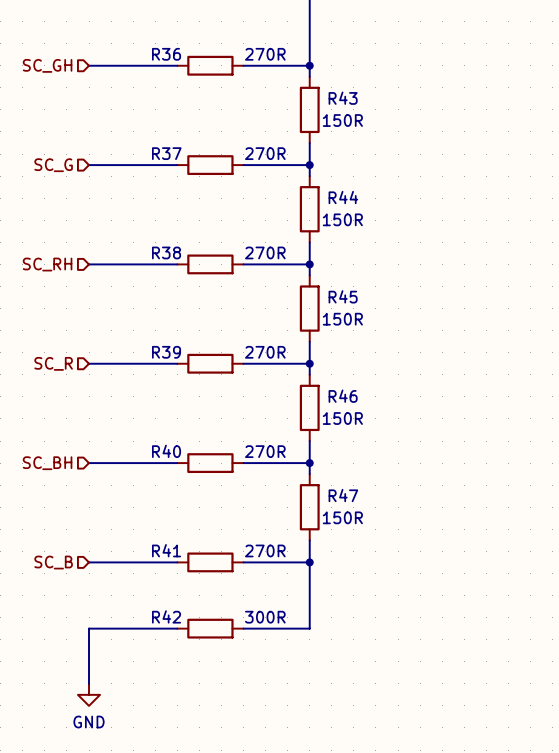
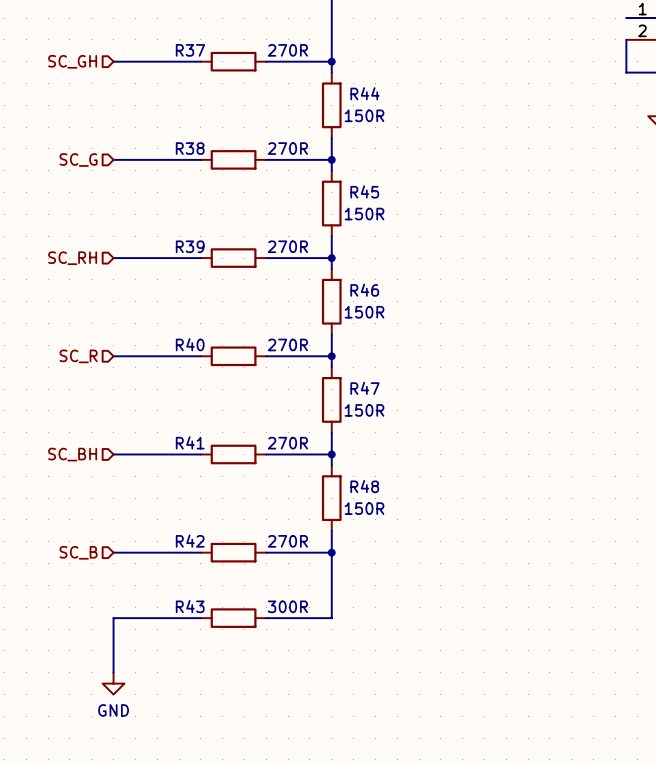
R36 name: R36 (166, 54) -> R37 (190, 50)
R43 name: R43 (343, 98) -> R44 (365, 93)
R37 name: R37 (166, 153) -> R38 (190, 148)
R44 name: R44 (343, 197) -> R45 (364, 191)
R38 name: R38 (166, 252) -> R39 (190, 246)
R45 name: R45 (343, 296) -> R46 (364, 290)
R39 name: R39 (166, 352) -> R40 (190, 344)
R46 name: R46 (343, 396) -> R47 (365, 388)
R40 name: R40 (166, 451) -> R41 (190, 442)
R47 name: R47 (343, 495) -> R48 (364, 486)
R41 name: R41 (166, 550) -> R42 (190, 541)
R42 name: R42 (166, 616) -> R43 (190, 606)

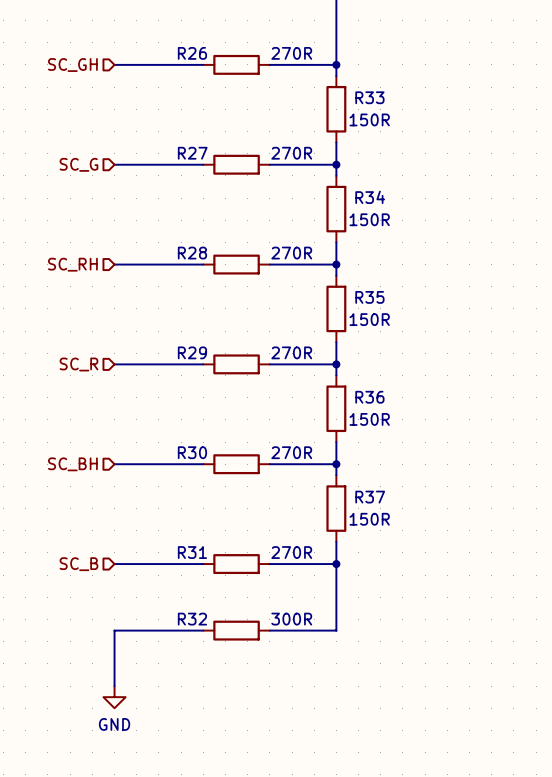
R37 name: R37 (190, 50) -> R26 (192, 53)
R44 name: R44 (365, 93) -> R33 (369, 97)
R38 name: R38 (190, 148) -> R27 (192, 153)
R45 name: R45 (364, 191) -> R34 (370, 197)
R39 name: R39 (190, 246) -> R28 (192, 253)
R46 name: R46 (364, 290) -> R35 (369, 297)
R40 name: R40 (190, 344) -> R29 (192, 352)
R47 name: R47 (365, 388) -> R36 (369, 397)
R41 name: R41 (190, 442) -> R30 (192, 452)
R48 name: R48 (364, 486) -> R37 (370, 497)
R42 name: R42 (190, 541) -> R31 (192, 552)
R43 name: R43 (190, 606) -> R32 (192, 619)

